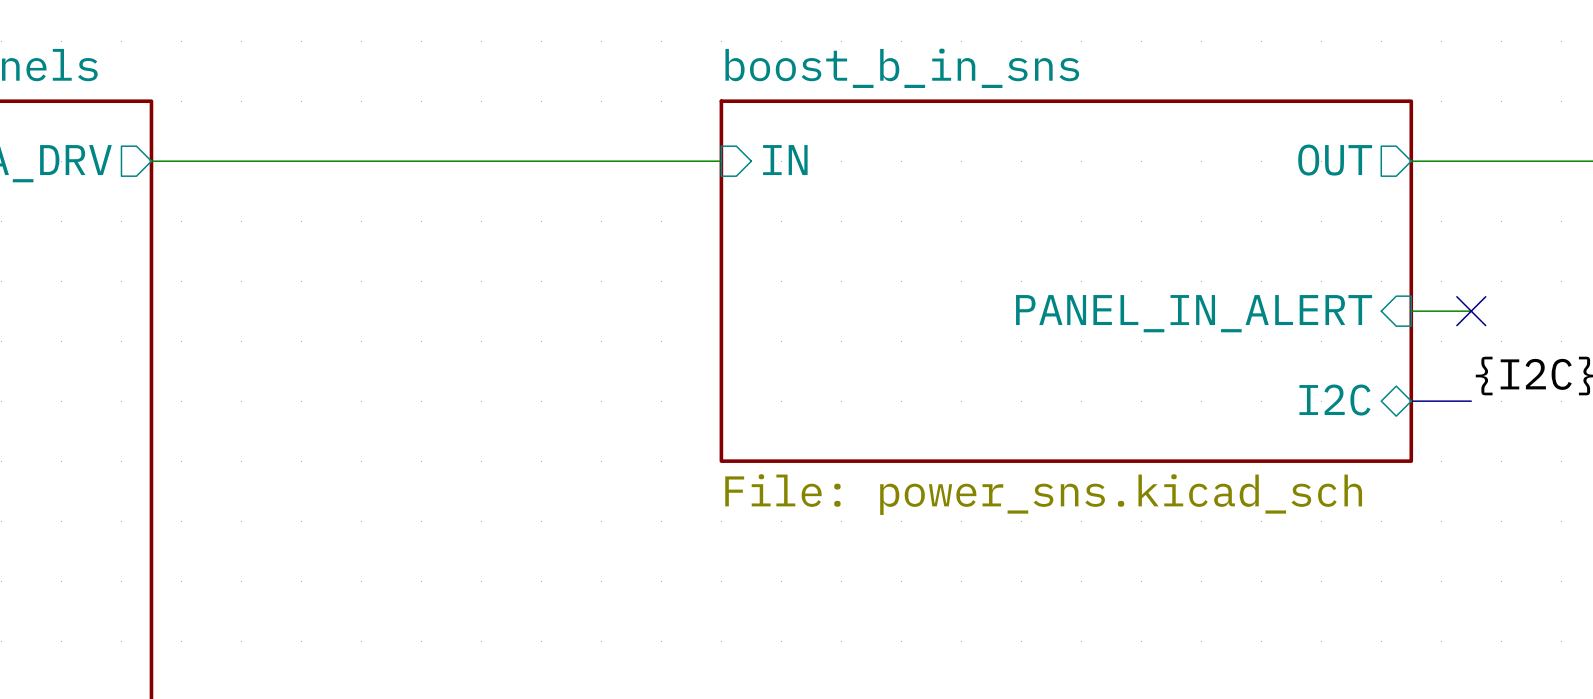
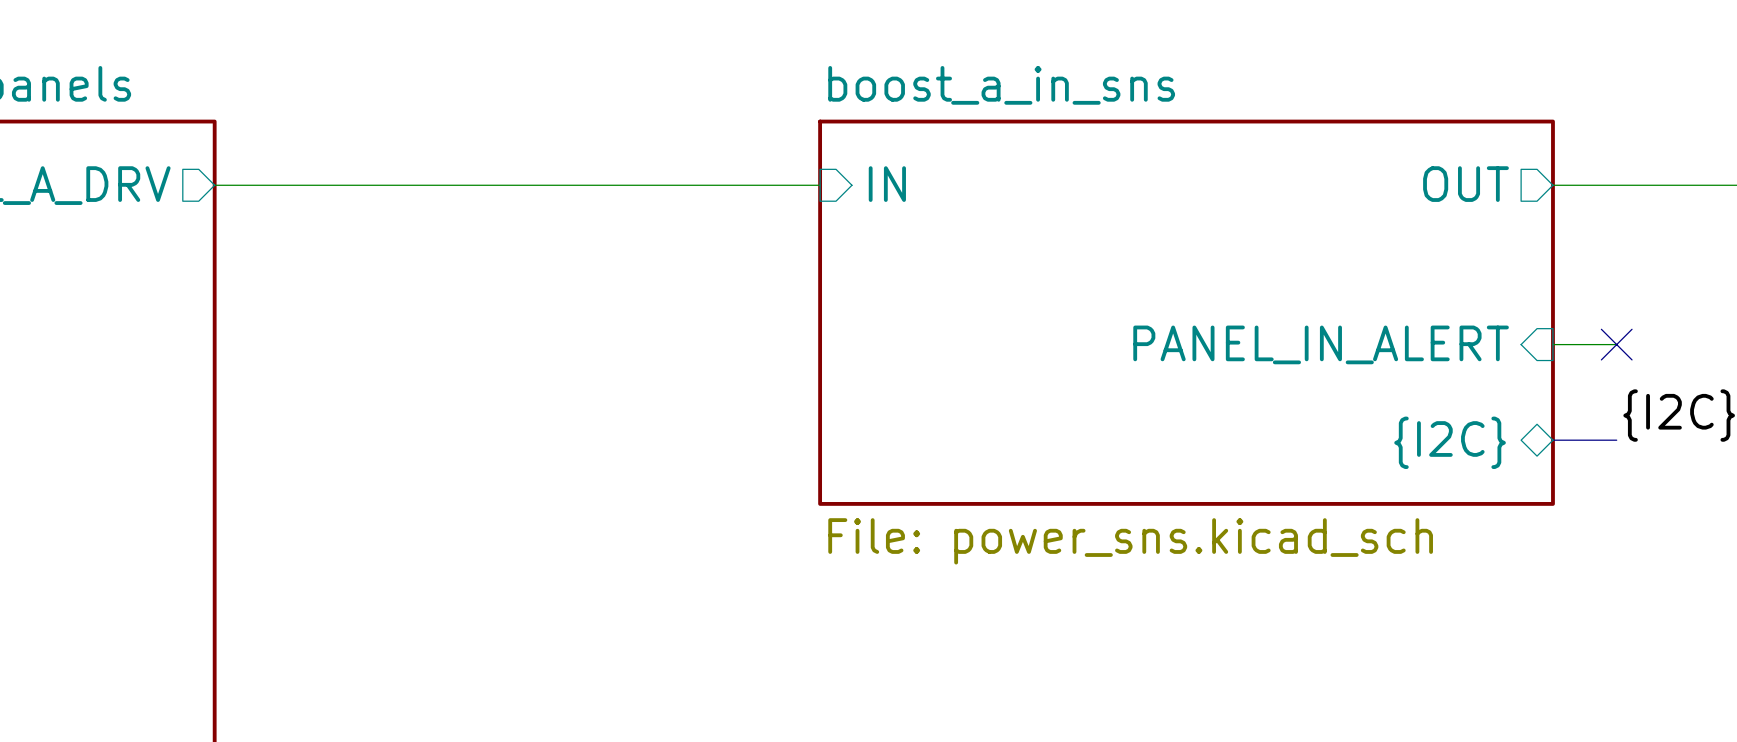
sheet boost_b_in_sns name: boost_b_in_sns (902, 68) -> boost_a_in_sns (1001, 85)
sheet pin: I2C (1334, 400) -> {I2C} (1450, 442)

